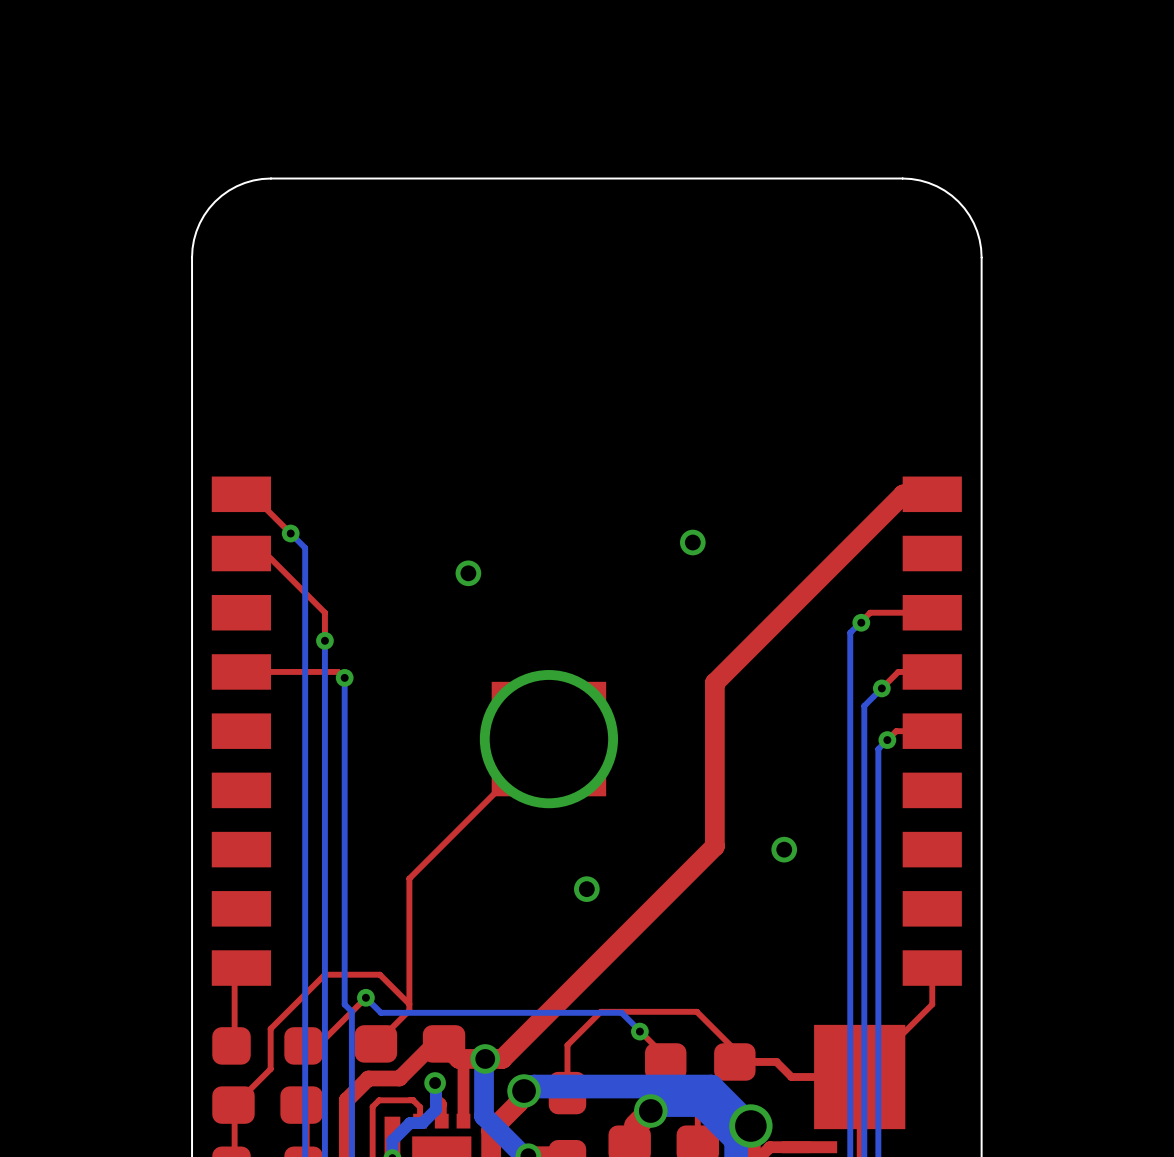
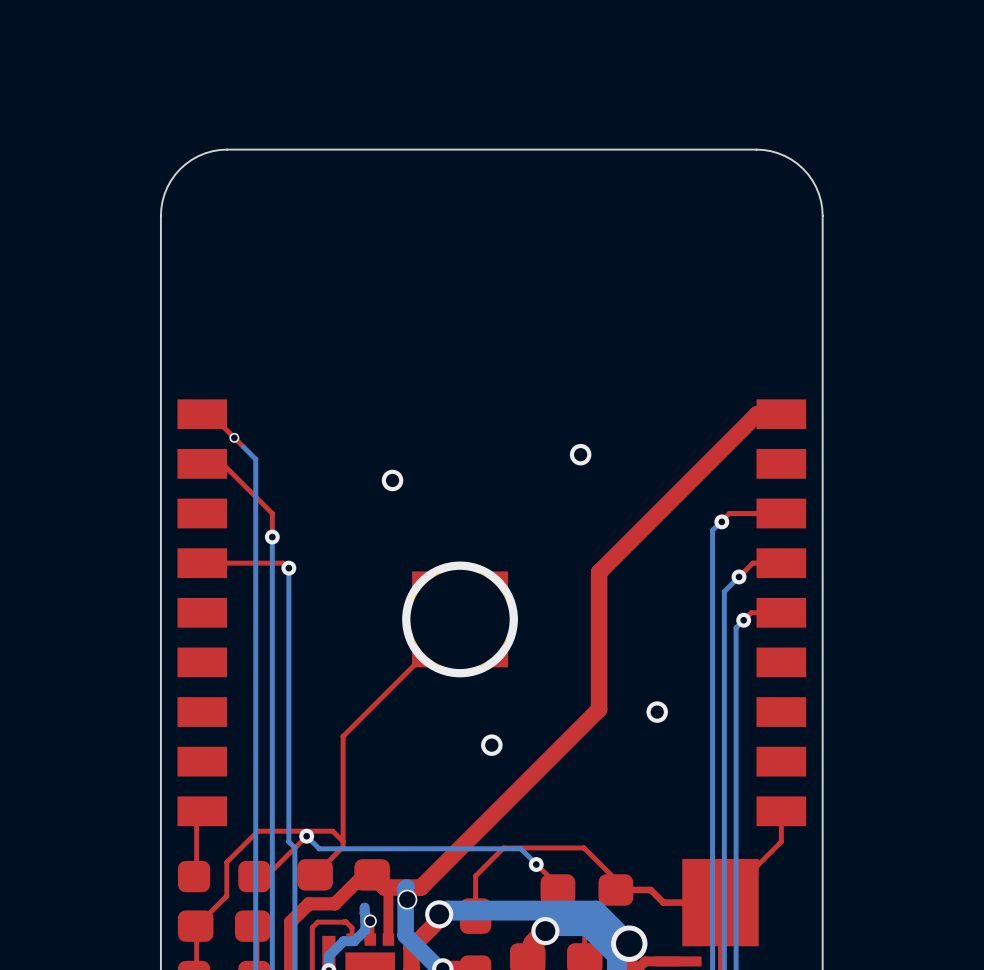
via position: (290, 533) -> (234, 437)
top track: (397, 991) (379, 974) (324, 974) (307, 991) -> (332, 831) (257, 831)
via position: (485, 1058) -> (407, 899)
via position: (435, 1083) -> (370, 921)

